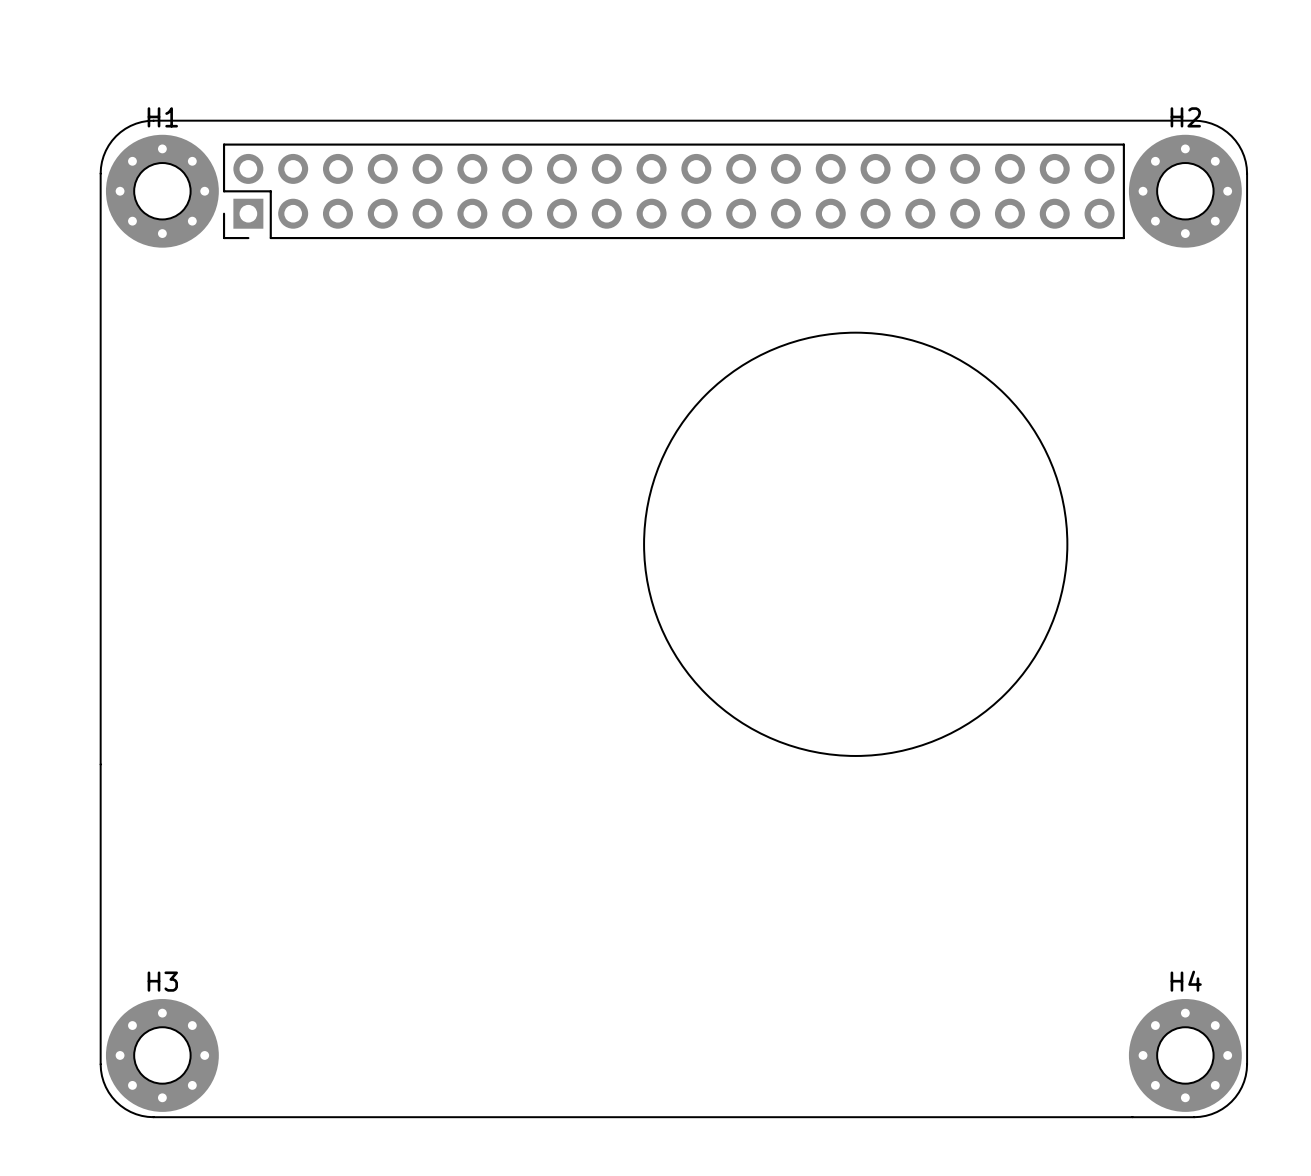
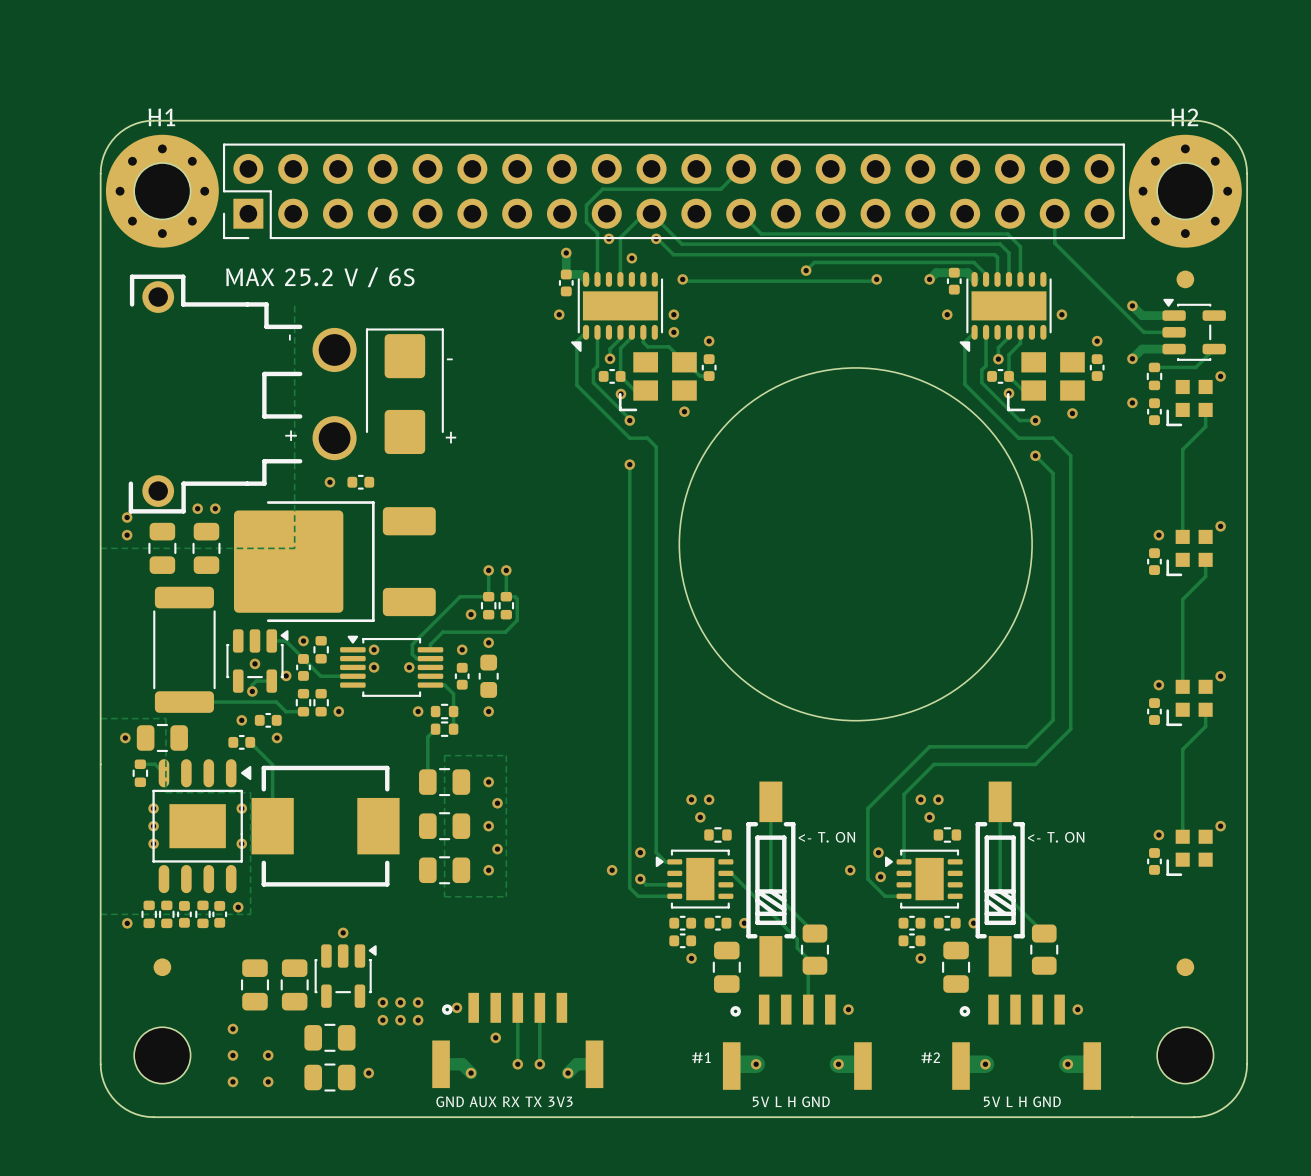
track: none -> (741, 168) (720, 189) (602, 189) (586, 205) (586, 222) (597, 233) (597, 279)
track: none -> (741, 213) (761, 234) (1007, 234) (1020, 246) (1020, 279)
track: none -> (1054, 213) (1054, 243) (1143, 332) (1174, 332)
via: none -> (608, 238)
track: none -> (656, 238) (673, 254) (994, 254) (997, 257) (997, 279)
via: none -> (656, 238)
track: none -> (566, 252) (566, 274) (581, 274) (586, 279)
via: none -> (566, 252)
via: none -> (631, 258)
track: none -> (806, 270) (814, 262) (973, 262) (986, 274) (986, 279)
via: none -> (806, 270)
text: none -> MAX 25.2 V / 6S (320, 277)
track: none -> (620, 279) (620, 237) (644, 213) (651, 213) (681, 244) (1000, 244) (1008, 252) (1008, 279)
track: none -> (682, 279) (684, 281) (874, 281) (876, 279)
via: none -> (682, 279)
via: none -> (876, 279)
track: none -> (929, 279) (936, 272) (967, 272) (974, 279)
via: none -> (929, 279)
part: none -> (1185, 279)
part: none -> (954, 281)
part: none -> (566, 282)
zone outline: none -> (294, 305) (294, 548) (100, 548)
track: none -> (1132, 305) (1142, 315) (1174, 315)
via: none -> (1132, 305)
part: none -> (617, 311)
part: none -> (1005, 311)
via: none -> (559, 314)
via: none -> (673, 314)
via: none -> (947, 314)
via: none -> (1061, 314)
part: none -> (1194, 329)
track: none -> (586, 332) (576, 341) (576, 385) (629, 438) (647, 438) (656, 446) (656, 852) (665, 861) (674, 861)
track: none -> (597, 332) (597, 366) (593, 370) (593, 382) (629, 420)
track: none -> (620, 332) (620, 338) (610, 349) (610, 358)
track: none -> (631, 332) (631, 337) (620, 348) (620, 376) (634, 390) (645, 390)
track: none -> (643, 332) (643, 342) (647, 346) (669, 346) (699, 376) (709, 376)
round board edge size: [643, 332, 1068, 757] -> [678, 367, 1033, 722]
via: none -> (673, 332)
track: none -> (974, 332) (964, 342) (964, 384) (1018, 438) (1053, 438) (1070, 455) (1070, 729) (1035, 764) (934, 764) (904, 794) (904, 861)
track: none -> (986, 332) (986, 365) (981, 370) (981, 382) (1019, 420) (1035, 420)
track: none -> (1008, 332) (1008, 337) (998, 347) (998, 359)
track: none -> (1020, 332) (1020, 343) (1008, 354) (1008, 376) (1023, 390) (1033, 390)
via: none -> (709, 341)
via: none -> (1097, 341)
track: none -> (1174, 349) (1142, 349) (1132, 358)
track: none -> (1214, 349) (1195, 367) (1154, 367)
text: none -> - (449, 359)
via: none -> (610, 358)
via: none -> (1132, 358)
via: none -> (998, 359)
part: none -> (709, 367)
part: none -> (1097, 367)
part: none -> (612, 376)
part: none -> (1000, 376)
part: none -> (1154, 376)
via: none -> (1220, 376)
part: none -> (657, 381)
part: none -> (1045, 381)
part: none -> (404, 391)
via: none -> (1008, 393)
part: none -> (242, 394)
via: none -> (620, 394)
via: none -> (1132, 402)
part: none -> (1189, 403)
track: none -> (1205, 409) (1205, 426) (1182, 449) (1182, 536)
via: none -> (684, 411)
part: none -> (1154, 411)
via: none -> (1072, 413)
via: none -> (629, 420)
via: none -> (1035, 420)
text: none -> + (450, 437)
track: none -> (1035, 455) (1053, 473) (1053, 720) (1026, 746) (929, 746) (867, 808) (867, 879) (885, 896) (904, 896)
via: none -> (1035, 455)
track: none -> (629, 464) (629, 887) (638, 896) (674, 896)
via: none -> (629, 464)
via: none -> (329, 482)
part: none -> (360, 482)
via: none -> (197, 508)
via: none -> (215, 508)
via: none -> (127, 517)
via: none -> (1220, 526)
via: none -> (127, 535)
via: none -> (1158, 535)
part: none -> (162, 548)
part: none -> (206, 548)
part: none -> (1189, 553)
track: none -> (1205, 559) (1205, 576) (1182, 599) (1182, 686)
part: none -> (334, 561)
part: none -> (1154, 561)
track: none -> (488, 570) (488, 596) (460, 596) (412, 644) (412, 654) (416, 658) (430, 658)
via: none -> (488, 570)
track: none -> (506, 570) (506, 596) (515, 596) (517, 598) (517, 620) (505, 632) (442, 632) (430, 644) (430, 649)
via: none -> (506, 570)
part: none -> (488, 605)
part: none -> (506, 605)
via: none -> (471, 614)
track: none -> (271, 640) (285, 640) (303, 658)
via: none -> (303, 640)
via: none -> (488, 642)
part: none -> (184, 649)
part: none -> (321, 649)
via: none -> (374, 649)
via: none -> (462, 649)
track: none -> (303, 658) (320, 676) (352, 676)
part: none -> (257, 661)
via: none -> (254, 663)
part: none -> (391, 666)
part: none -> (303, 667)
via: none -> (374, 667)
via: none -> (409, 667)
via: none -> (286, 675)
part: none -> (462, 676)
part: none -> (488, 676)
via: none -> (1220, 676)
track: none -> (271, 681) (256, 681) (252, 685) (252, 691)
track: none -> (430, 685) (444, 685) (453, 694) (453, 729)
via: none -> (1158, 685)
via: none -> (252, 691)
track: none -> (184, 702) (276, 702) (286, 711) (303, 711)
part: none -> (303, 702)
part: none -> (321, 702)
part: none -> (1189, 702)
track: none -> (1205, 709) (1205, 726) (1182, 749) (1182, 836)
via: none -> (338, 711)
via: none -> (418, 711)
part: none -> (444, 711)
via: none -> (488, 711)
part: none -> (1154, 711)
zone outline: none -> (100, 718) (165, 718) (165, 792) (250, 792) (250, 914) (100, 914)
via: none -> (241, 720)
part: none -> (268, 720)
track: none -> (435, 729) (427, 736) (427, 782)
part: none -> (444, 729)
via: none -> (125, 737)
part: none -> (162, 737)
via: none -> (277, 737)
part: none -> (241, 742)
track: none -> (250, 742) (272, 764) (272, 826)
zone outline: none -> (444, 755) (444, 896) (506, 896) (506, 755) (444, 755)
track: none -> (140, 764) (154, 764) (163, 773)
part: none -> (140, 773)
part: none -> (444, 782)
via: none -> (488, 782)
via: none -> (691, 799)
via: none -> (709, 799)
via: none -> (920, 799)
via: none -> (938, 799)
track: none -> (770, 801) (770, 889) (814, 933)
track: none -> (1000, 801) (1000, 889) (1044, 933)
via: none -> (497, 803)
via: none -> (153, 808)
via: none -> (241, 808)
via: none -> (700, 817)
via: none -> (929, 817)
via: none -> (153, 826)
part: none -> (201, 826)
part: none -> (325, 826)
part: none -> (444, 826)
via: none -> (488, 826)
via: none -> (1220, 826)
part: none -> (717, 834)
part: none -> (947, 834)
via: none -> (1158, 834)
text: none -> <- T. ON (826, 837)
text: none -> <- T. ON (1056, 837)
via: none -> (153, 843)
via: none -> (241, 843)
via: none -> (497, 849)
via: none -> (640, 852)
via: none -> (878, 852)
part: none -> (1189, 852)
part: none -> (1154, 861)
part: none -> (444, 870)
via: none -> (488, 870)
via: none -> (612, 870)
via: none -> (850, 870)
track: none -> (725, 873) (731, 873) (797, 939) (797, 948) (814, 965) (808, 972) (808, 1009)
via: none -> (880, 876)
track: none -> (640, 879) (646, 884) (674, 884)
via: none -> (640, 879)
part: none -> (694, 879)
part: none -> (770, 879)
part: none -> (923, 879)
part: none -> (1000, 879)
via: none -> (238, 907)
part: none -> (149, 914)
part: none -> (166, 914)
part: none -> (184, 914)
part: none -> (202, 914)
part: none -> (219, 914)
via: none -> (127, 923)
part: none -> (682, 923)
part: none -> (717, 923)
via: none -> (744, 923)
part: none -> (911, 923)
part: none -> (947, 923)
via: none -> (973, 923)
via: none -> (343, 932)
part: none -> (682, 940)
part: none -> (911, 940)
part: none -> (814, 949)
part: none -> (1044, 949)
via: none -> (691, 958)
via: none -> (920, 958)
part: none -> (162, 967)
part: none -> (726, 967)
part: none -> (956, 967)
part: none -> (1185, 967)
part: none -> (345, 976)
part: none -> (254, 984)
part: none -> (294, 984)
via: none -> (382, 1002)
via: none -> (400, 1002)
via: none -> (418, 1002)
via: none -> (456, 1007)
track: none -> (517, 1007) (517, 1064)
track: none -> (539, 1007) (539, 1064)
via: none -> (848, 1009)
via: none -> (1077, 1009)
via: none -> (382, 1020)
via: none -> (400, 1020)
via: none -> (418, 1020)
via: none -> (232, 1029)
part: none -> (329, 1037)
via: none -> (495, 1037)
part: none -> (517, 1040)
part: none -> (797, 1042)
part: none -> (1026, 1042)
H3: (162, 1055) -> none
via: none -> (232, 1055)
via: none -> (268, 1055)
H4: (1185, 1055) -> none
text: none -> #1 (701, 1057)
text: none -> #2 (930, 1057)
track: none -> (441, 1064) (462, 1064) (471, 1073)
via: none -> (517, 1064)
via: none -> (539, 1064)
track: none -> (594, 1064) (576, 1064) (568, 1073)
track: none -> (732, 1064) (756, 1064)
via: none -> (756, 1064)
track: none -> (838, 1064) (861, 1064)
via: none -> (838, 1064)
track: none -> (961, 1064) (985, 1064)
via: none -> (985, 1064)
track: none -> (1067, 1064) (1091, 1064)
via: none -> (1067, 1064)
via: none -> (368, 1073)
via: none -> (471, 1073)
via: none -> (568, 1073)
part: none -> (329, 1077)
via: none -> (232, 1081)
via: none -> (268, 1081)
text: none -> GND AUX RX TX 3V3 (504, 1101)
text: none -> 5V L H GND (791, 1101)
text: none -> 5V L H GND (1022, 1101)

